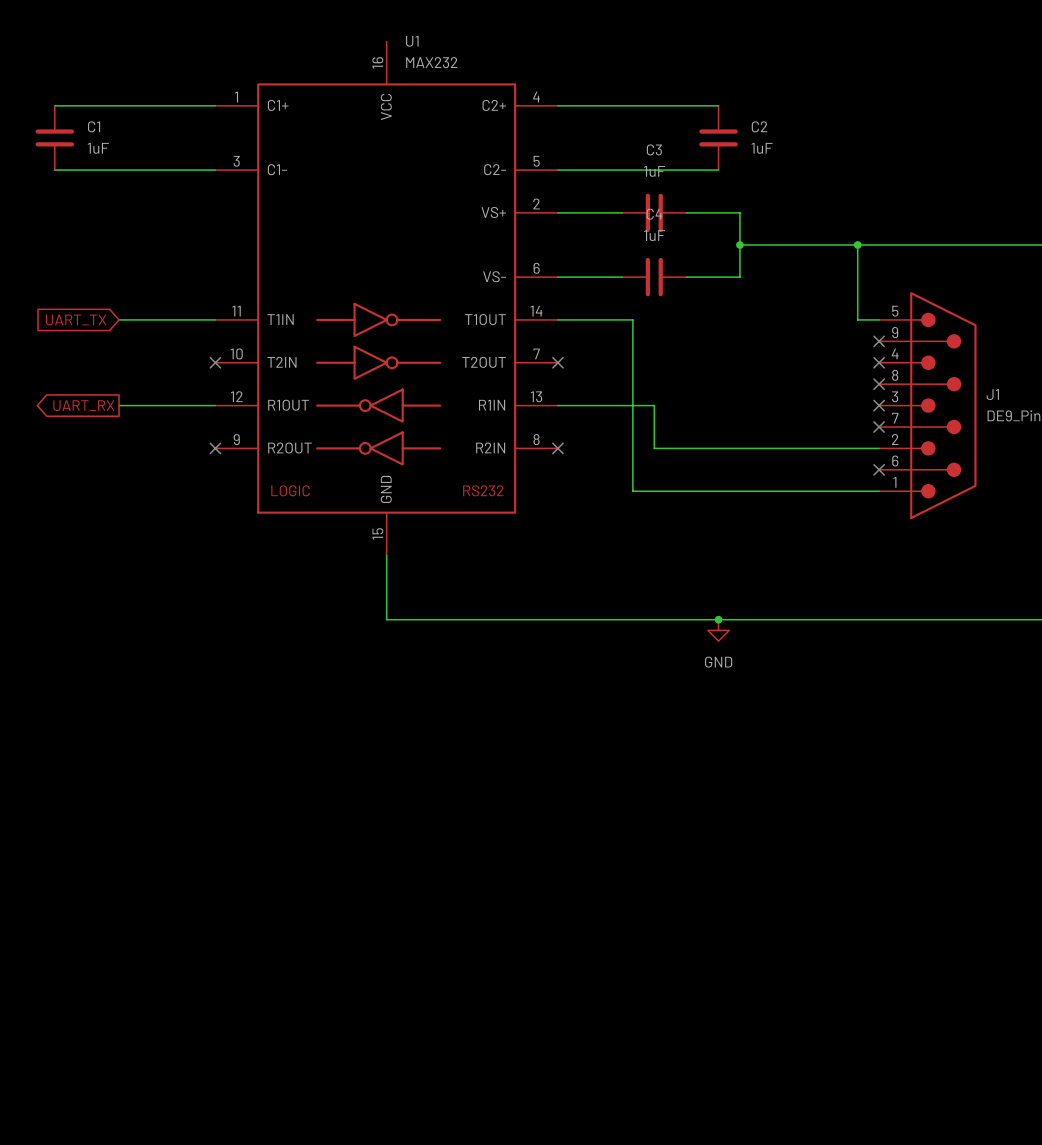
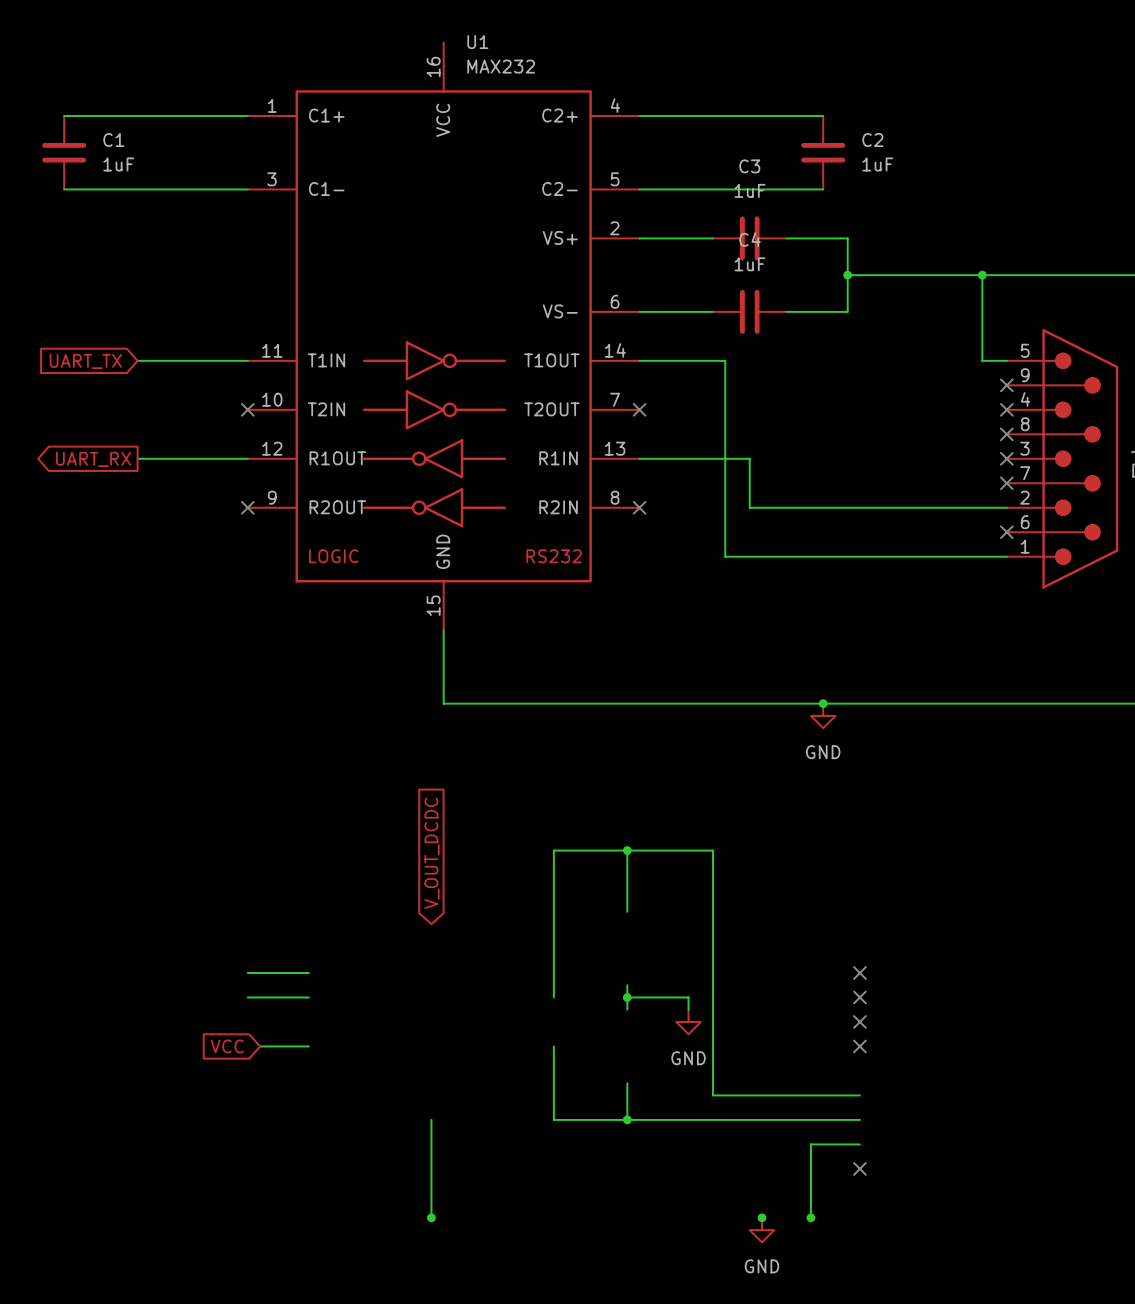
wire: none -> (627, 850) (627, 911)
junction: none -> (627, 850)
global label: none -> V_OUT_DCDC (432, 853)
wire: none -> (247, 973) (309, 973)
no-connect mark: none -> (859, 973)
wire: none -> (627, 985) (627, 1009)
wire: none -> (247, 997) (309, 997)
wire: none -> (553, 997) (553, 850) (713, 850) (713, 1095) (859, 1095)
wire: none -> (627, 997) (688, 997) (688, 1009)
junction: none -> (627, 997)
no-connect mark: none -> (859, 997)
power symbol: none -> GND (688, 1021)
no-connect mark: none -> (859, 1021)
global label: none -> VCC (227, 1046)
wire: none -> (260, 1046) (309, 1046)
wire: none -> (553, 1046) (553, 1119) (859, 1119)
no-connect mark: none -> (859, 1046)
wire: none -> (627, 1083) (627, 1119)
wire: none -> (431, 1119) (431, 1217)
junction: none -> (627, 1119)
wire: none -> (859, 1144) (810, 1144) (810, 1217)
no-connect mark: none -> (859, 1168)
junction: none -> (431, 1217)
junction: none -> (762, 1217)
junction: none -> (810, 1217)
power symbol: none -> GND (762, 1230)

